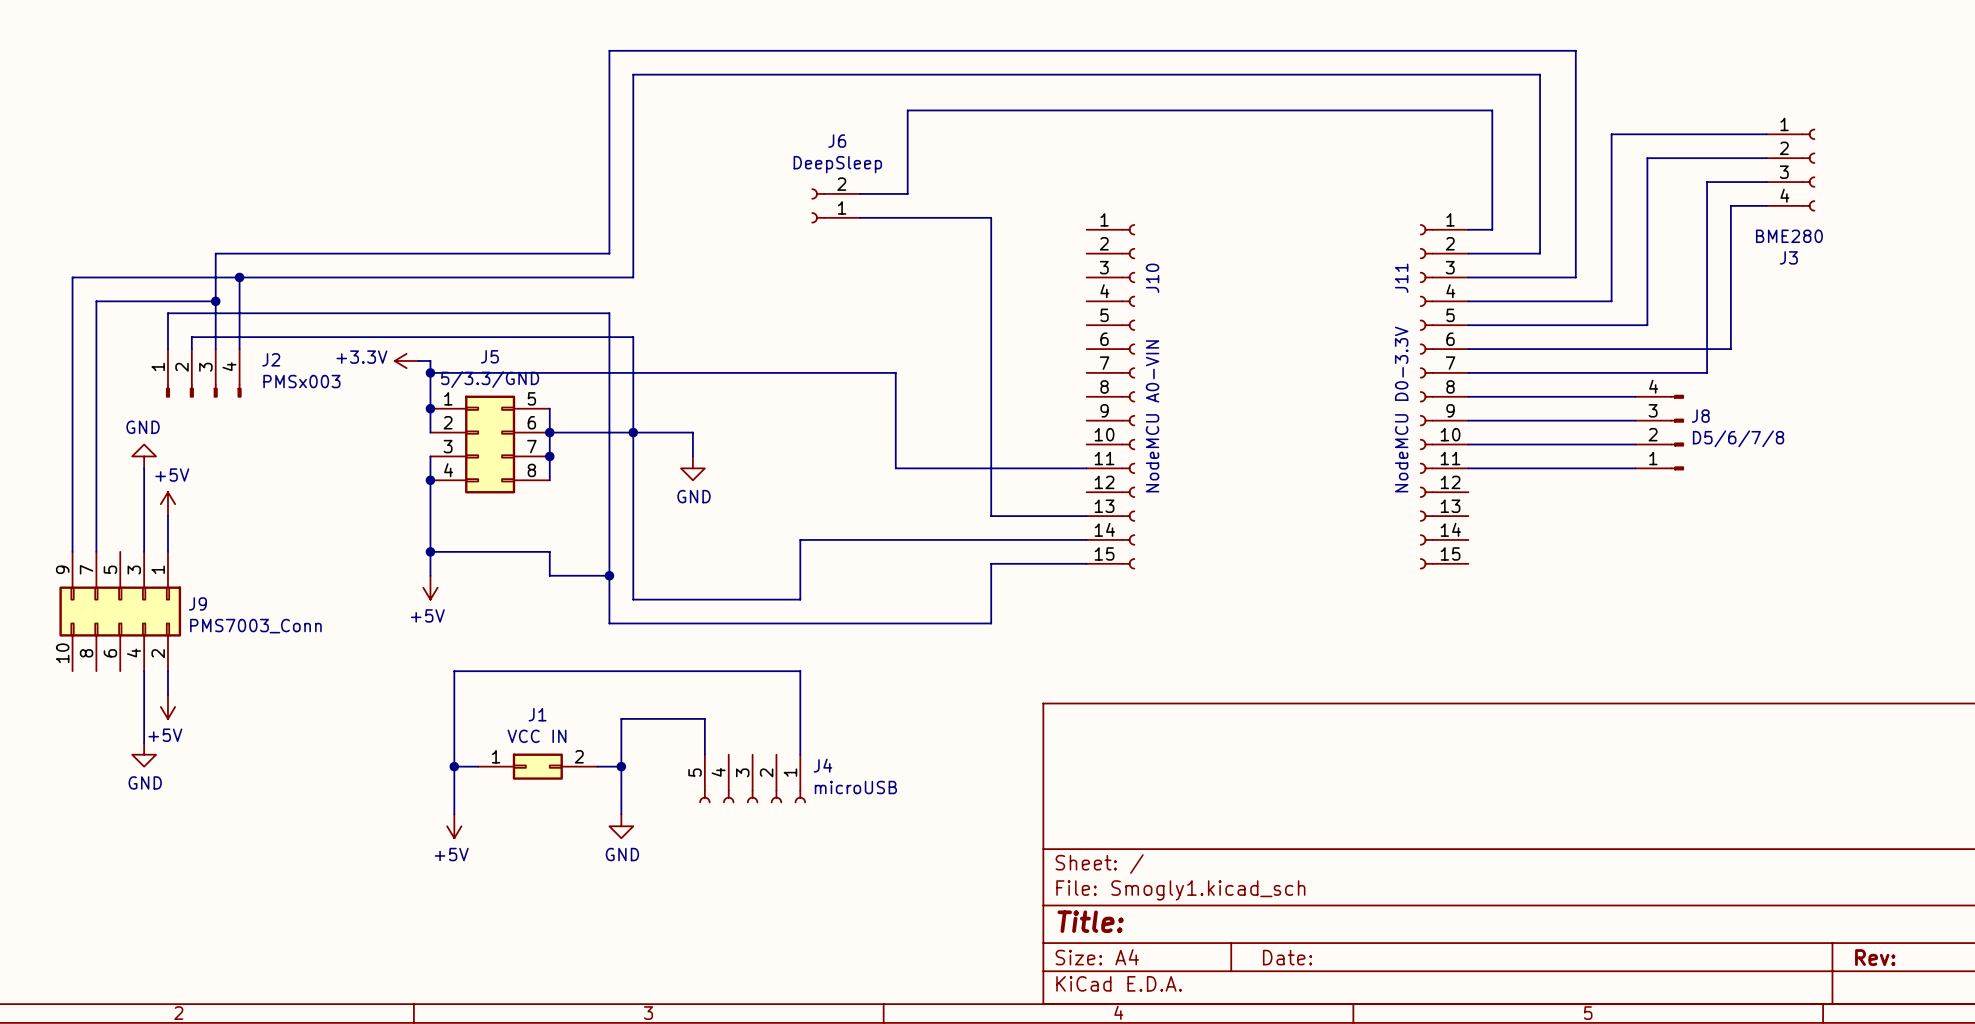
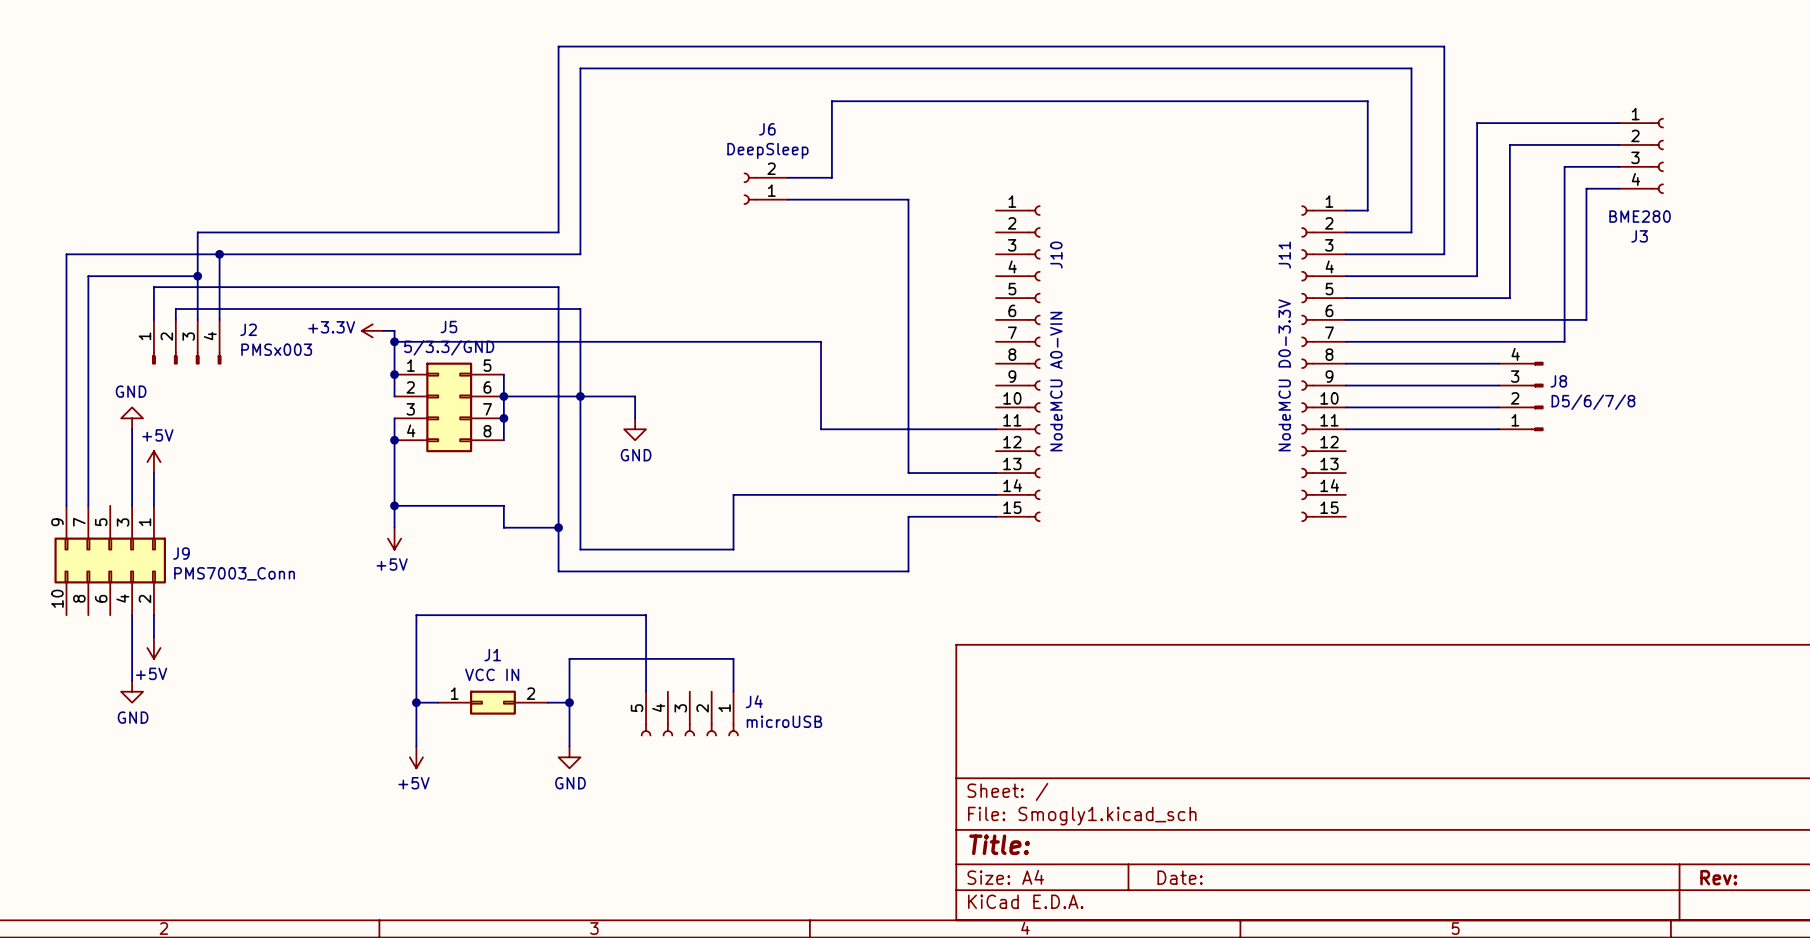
wire: (704, 671) (800, 671) (800, 718) -> (646, 615) (646, 658) (733, 658)

